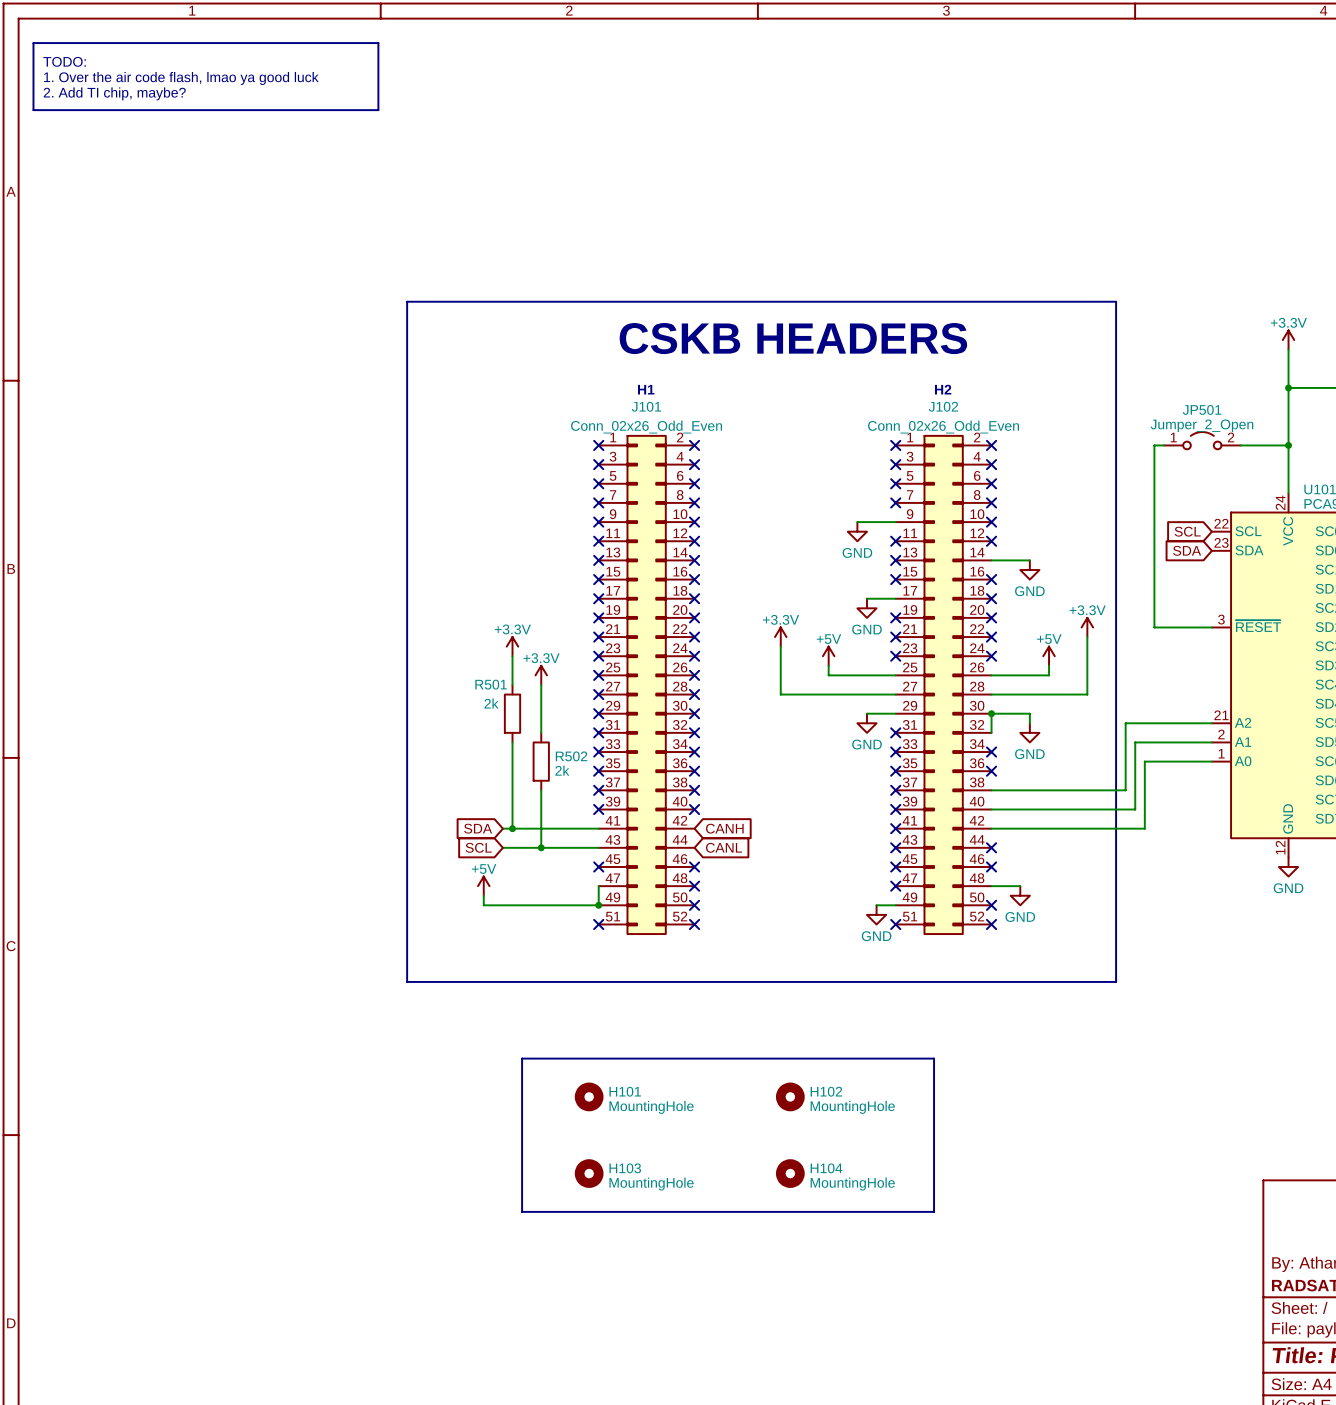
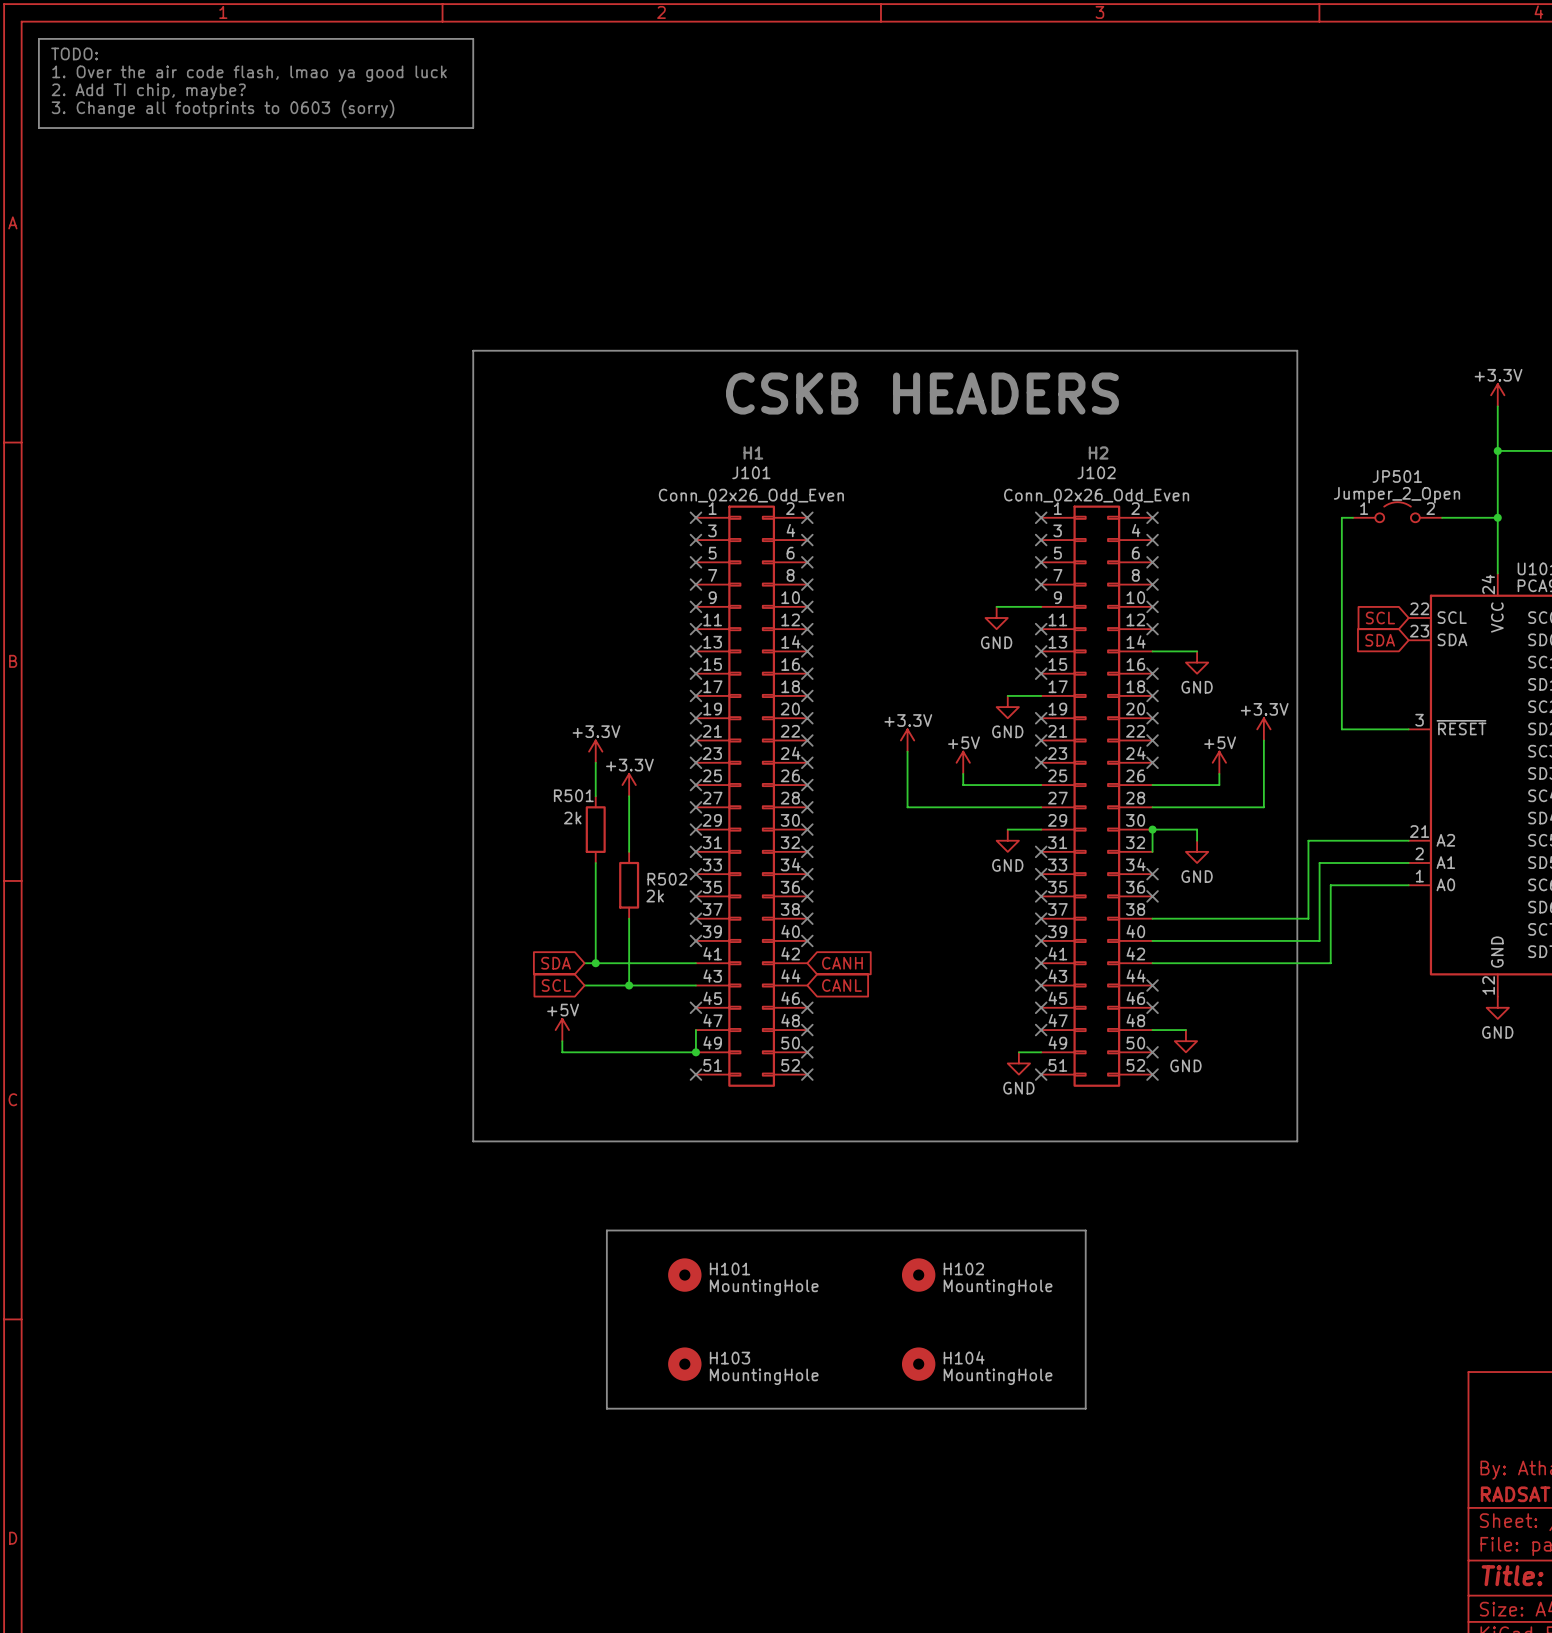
line: (33, 43) (378, 43) (378, 110) -> (38, 50) (38, 38) (473, 38) (473, 128) (439, 128)
text: none -> TODO: (74, 53)
text: TODO: (64, 61) -> 1. Over the air code flash, lmao ya good luck (249, 73)
text: 1. Over the air code flash, lmao ya good luck (181, 78) -> 2. Add TI chip, maybe? (148, 91)
text: 2. Add TI chip, maybe? (114, 93) -> 3. Change all footprints to 0603 (sorry) (223, 109)

